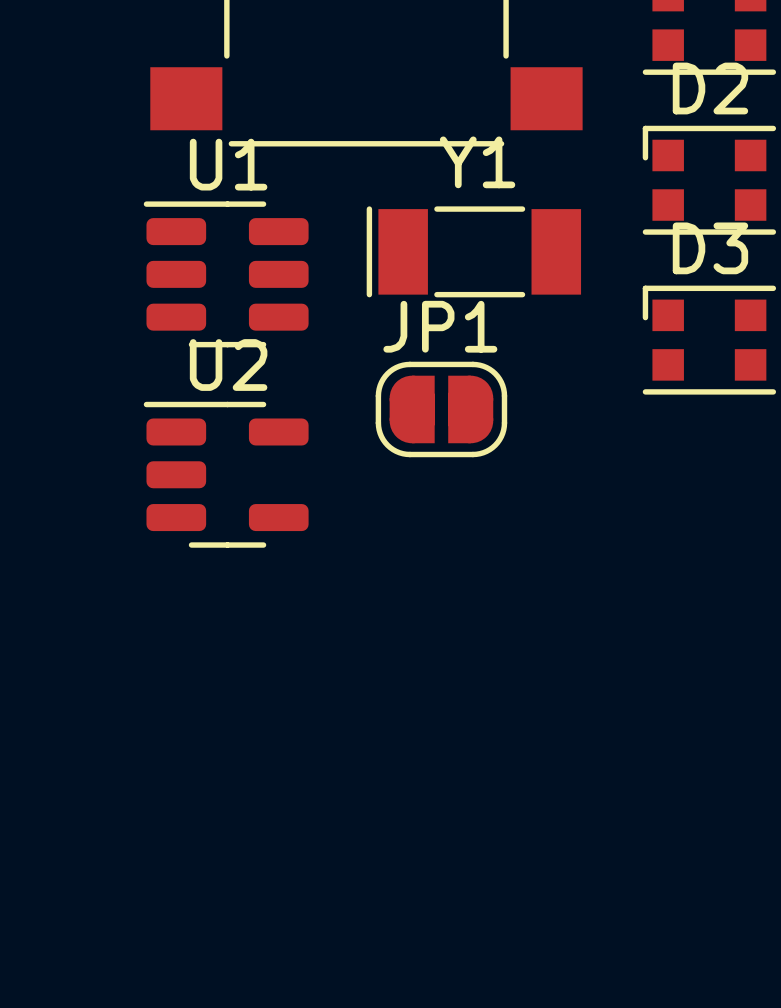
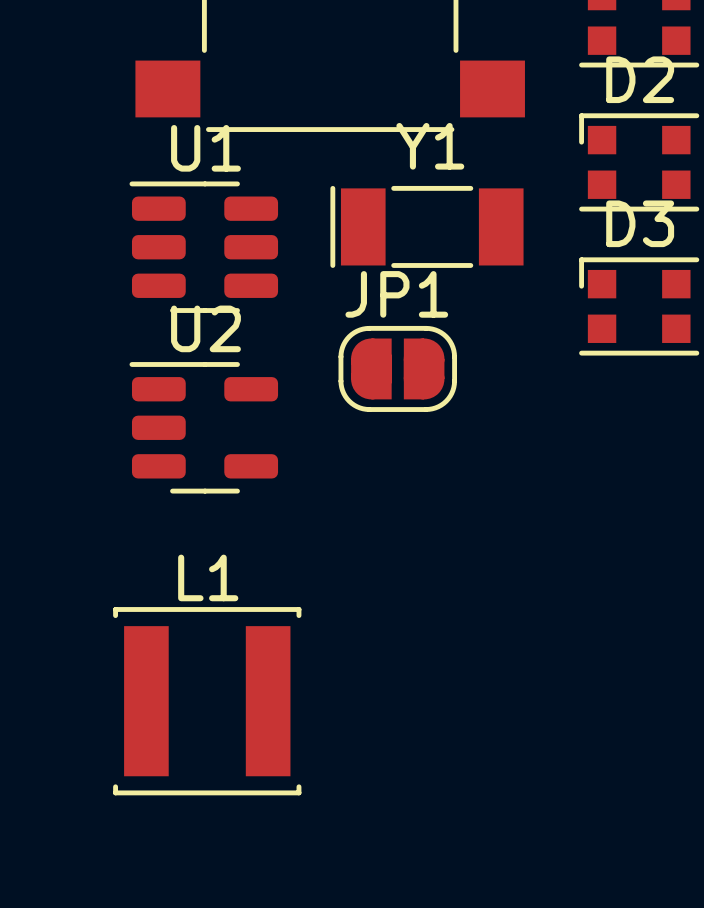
L1: none -> (207, 701)

